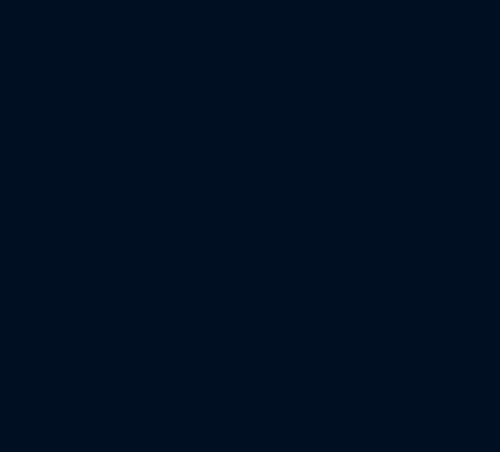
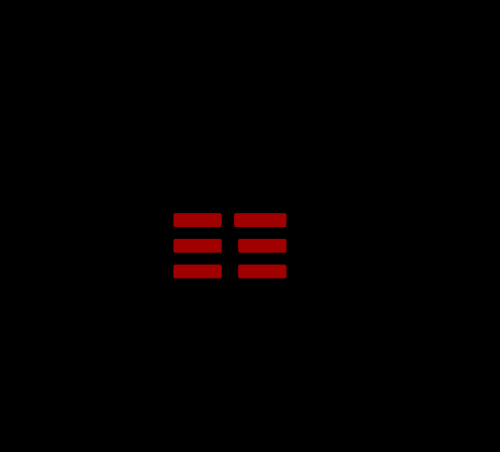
part: none -> (229, 245)

